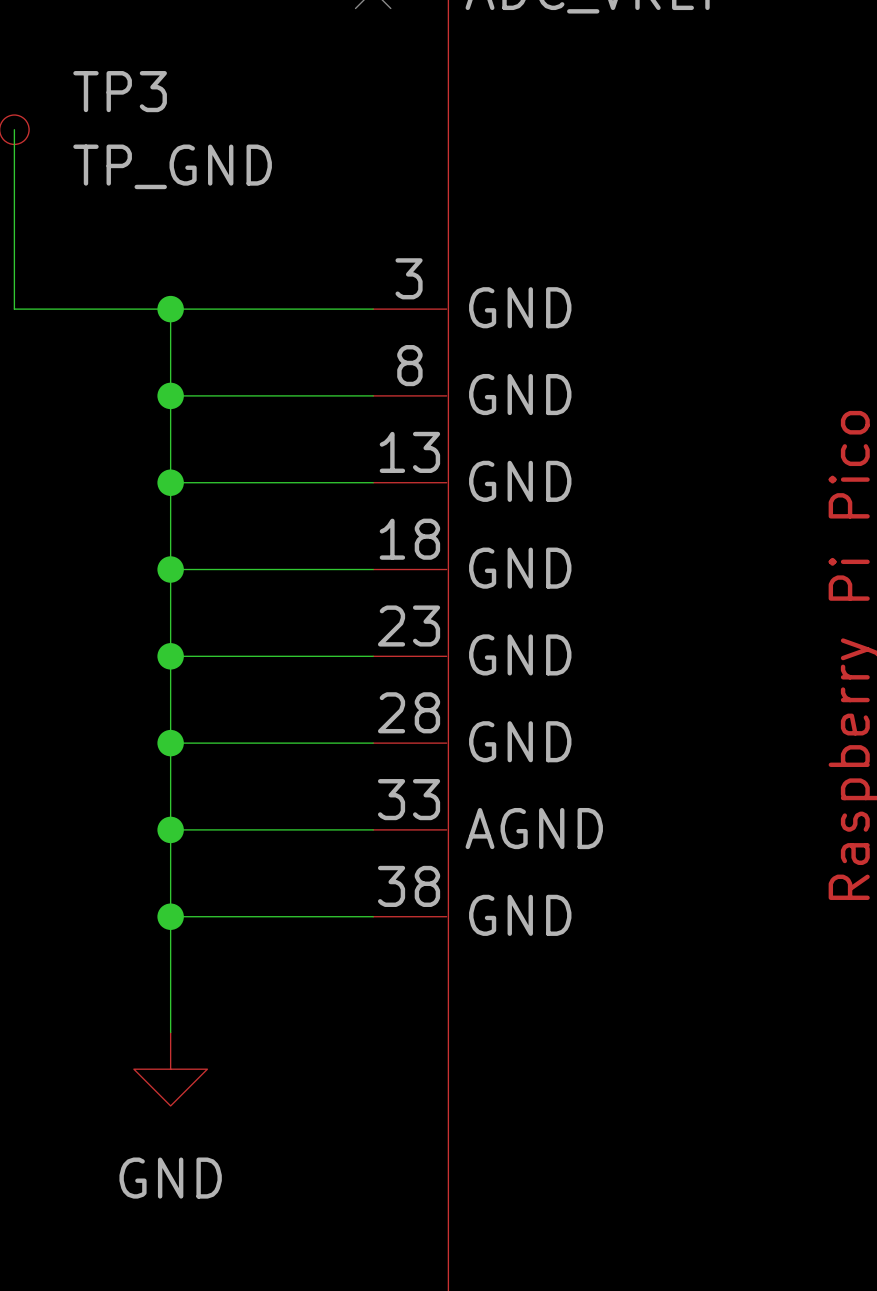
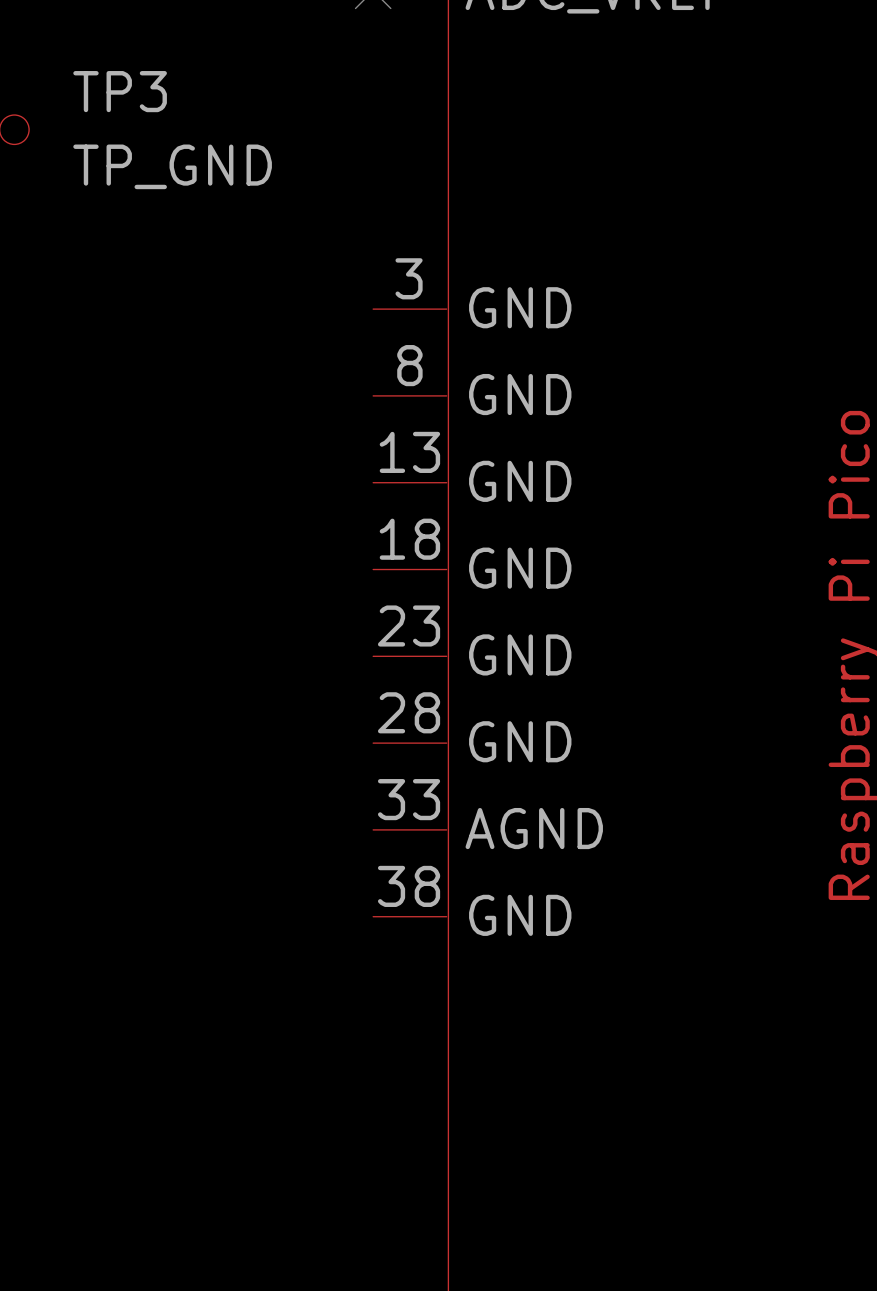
wire: (14, 129) (14, 309) (373, 309) -> none
wire: (170, 309) (170, 1032) -> none
junction: (170, 309) -> none
wire: (170, 395) (373, 395) -> none
junction: (170, 395) -> none
wire: (170, 482) (373, 482) -> none
junction: (170, 482) -> none
wire: (170, 569) (373, 569) -> none
junction: (170, 569) -> none
wire: (170, 656) (373, 656) -> none
junction: (170, 656) -> none
wire: (170, 743) (373, 743) -> none
junction: (170, 743) -> none
wire: (170, 829) (373, 829) -> none
junction: (170, 829) -> none
wire: (170, 916) (373, 916) -> none
junction: (170, 916) -> none
power symbol: GND (170, 1069) -> none

